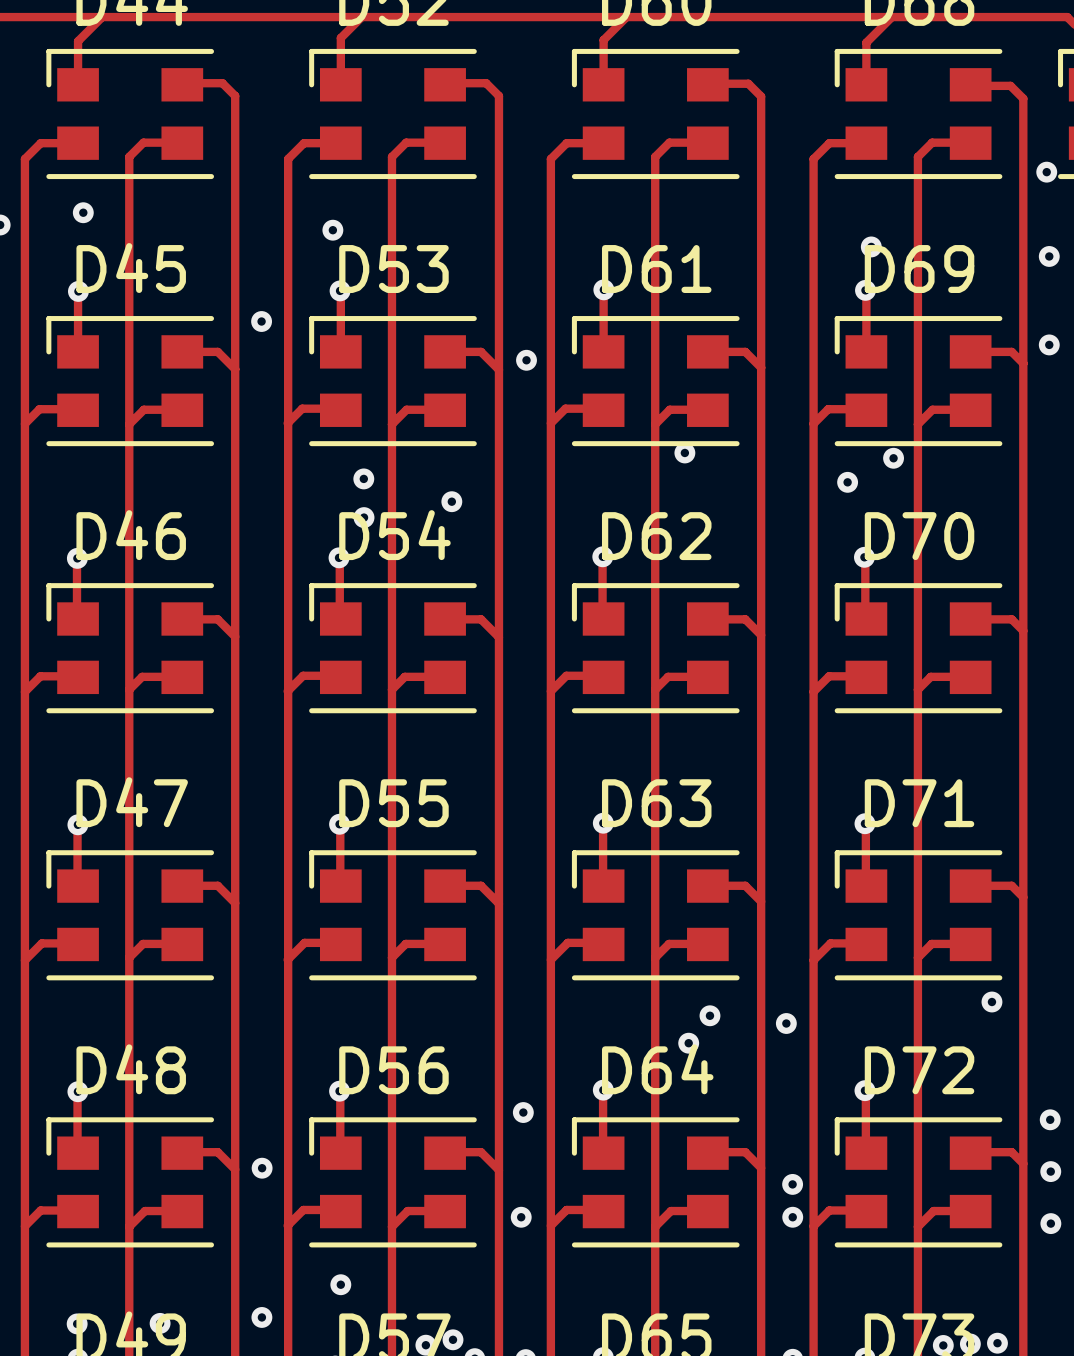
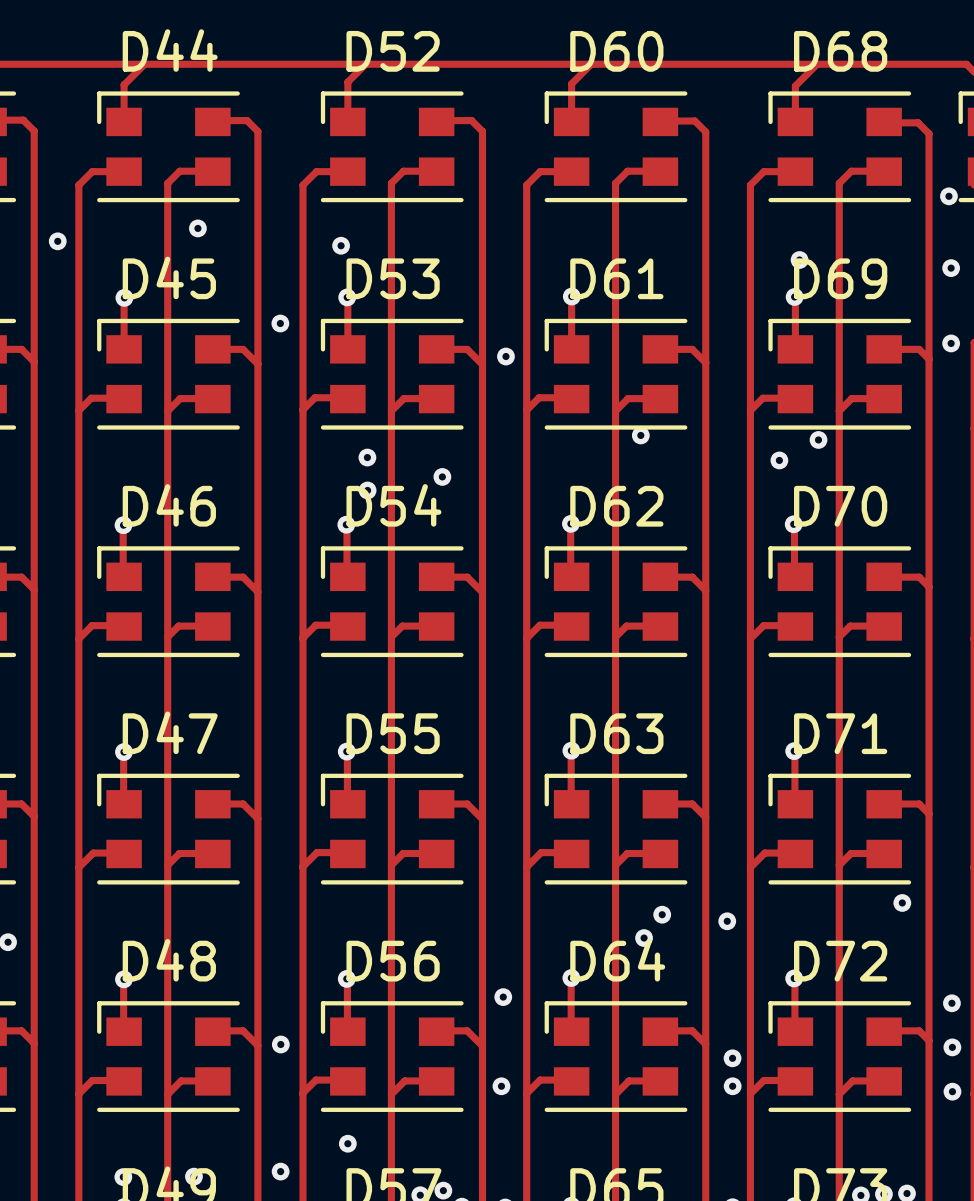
via position: (83, 212) -> (197, 228)

